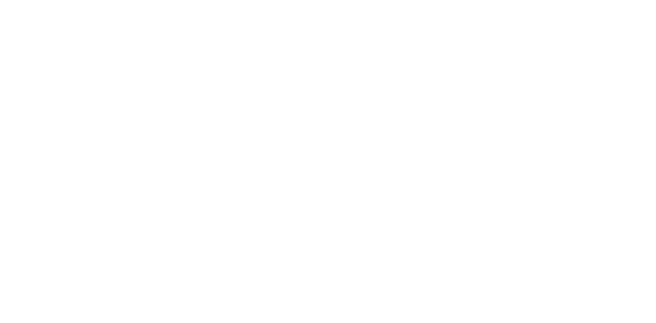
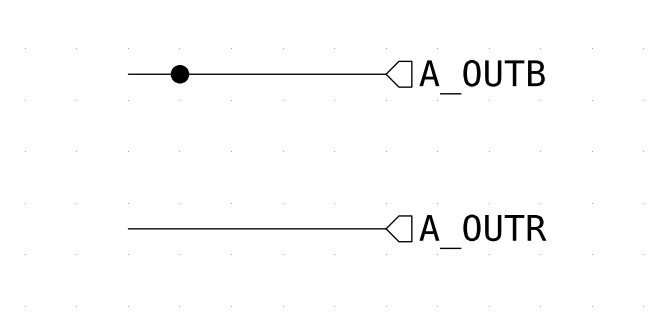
wire: none -> (128, 74) (386, 74)
junction: none -> (179, 74)
hierarchical label: none -> A_OUTB (482, 77)
wire: none -> (128, 228) (386, 228)
hierarchical label: none -> A_OUTR (482, 231)

